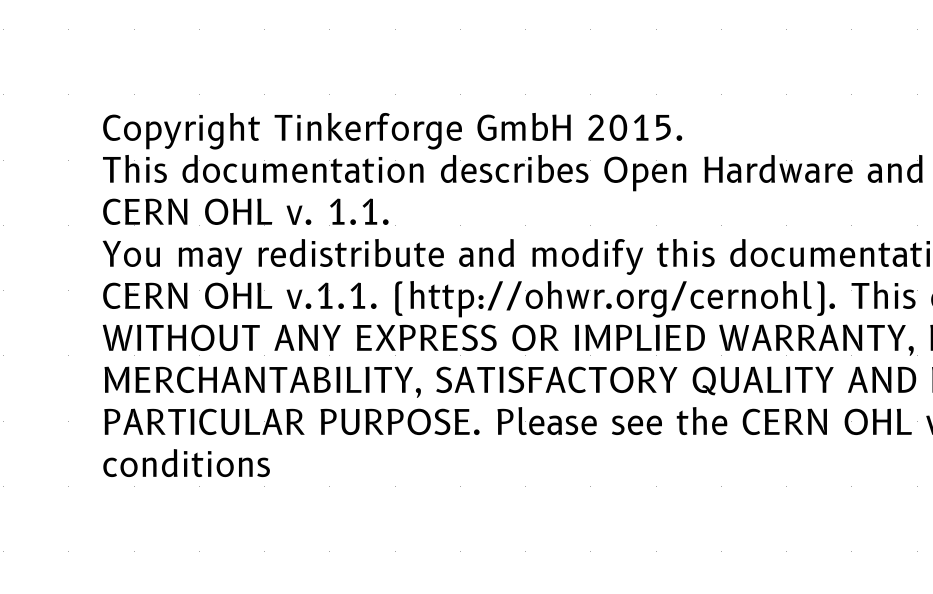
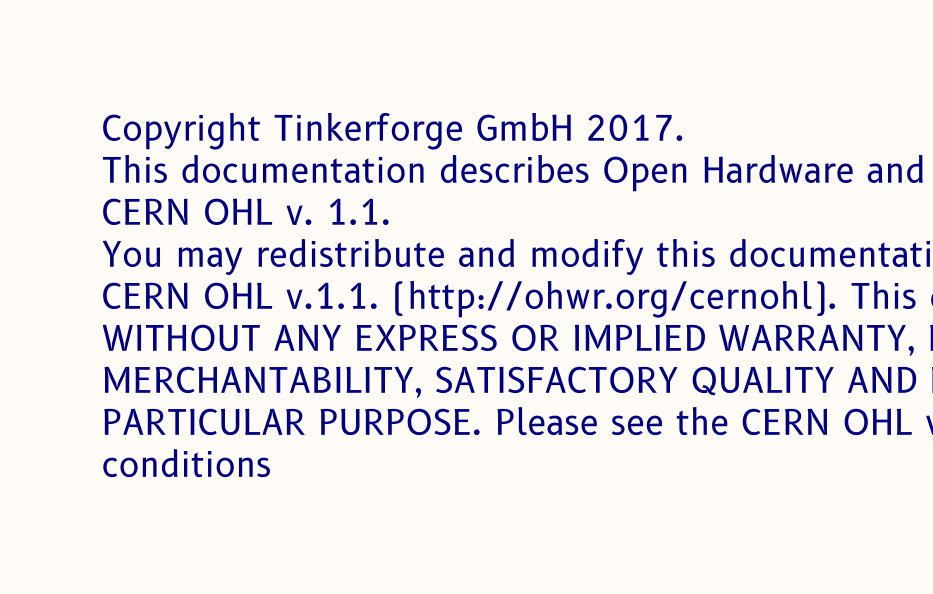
text: Copyright Tinkerforge GmbH 2015. (392, 131) -> Copyright Tinkerforge GmbH 2017. (392, 131)

